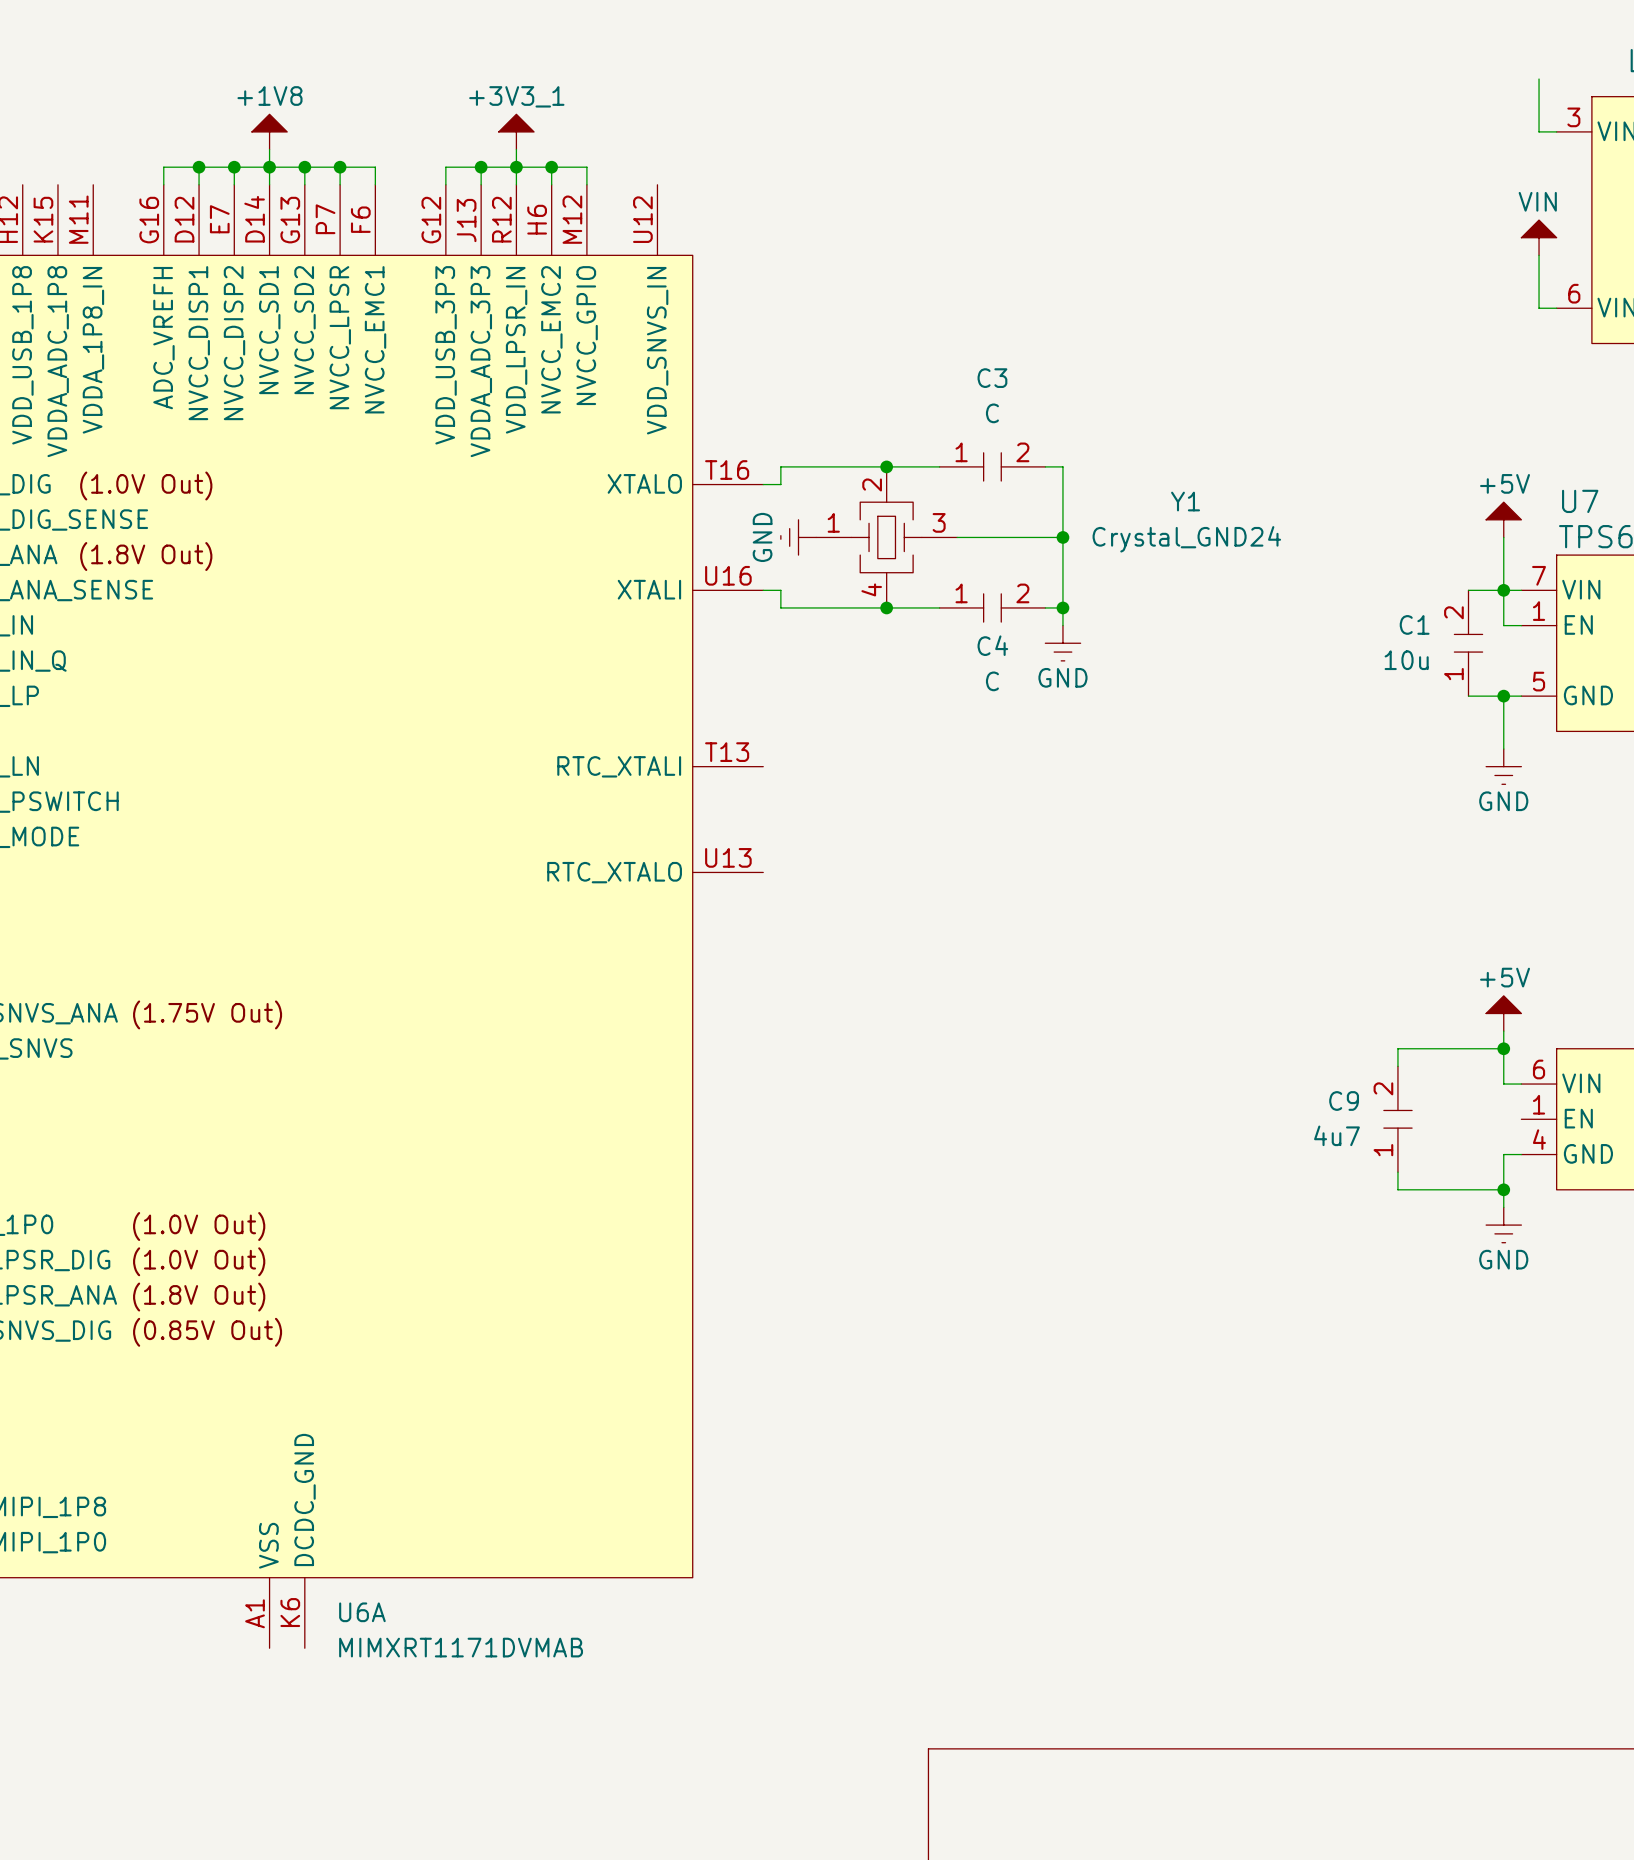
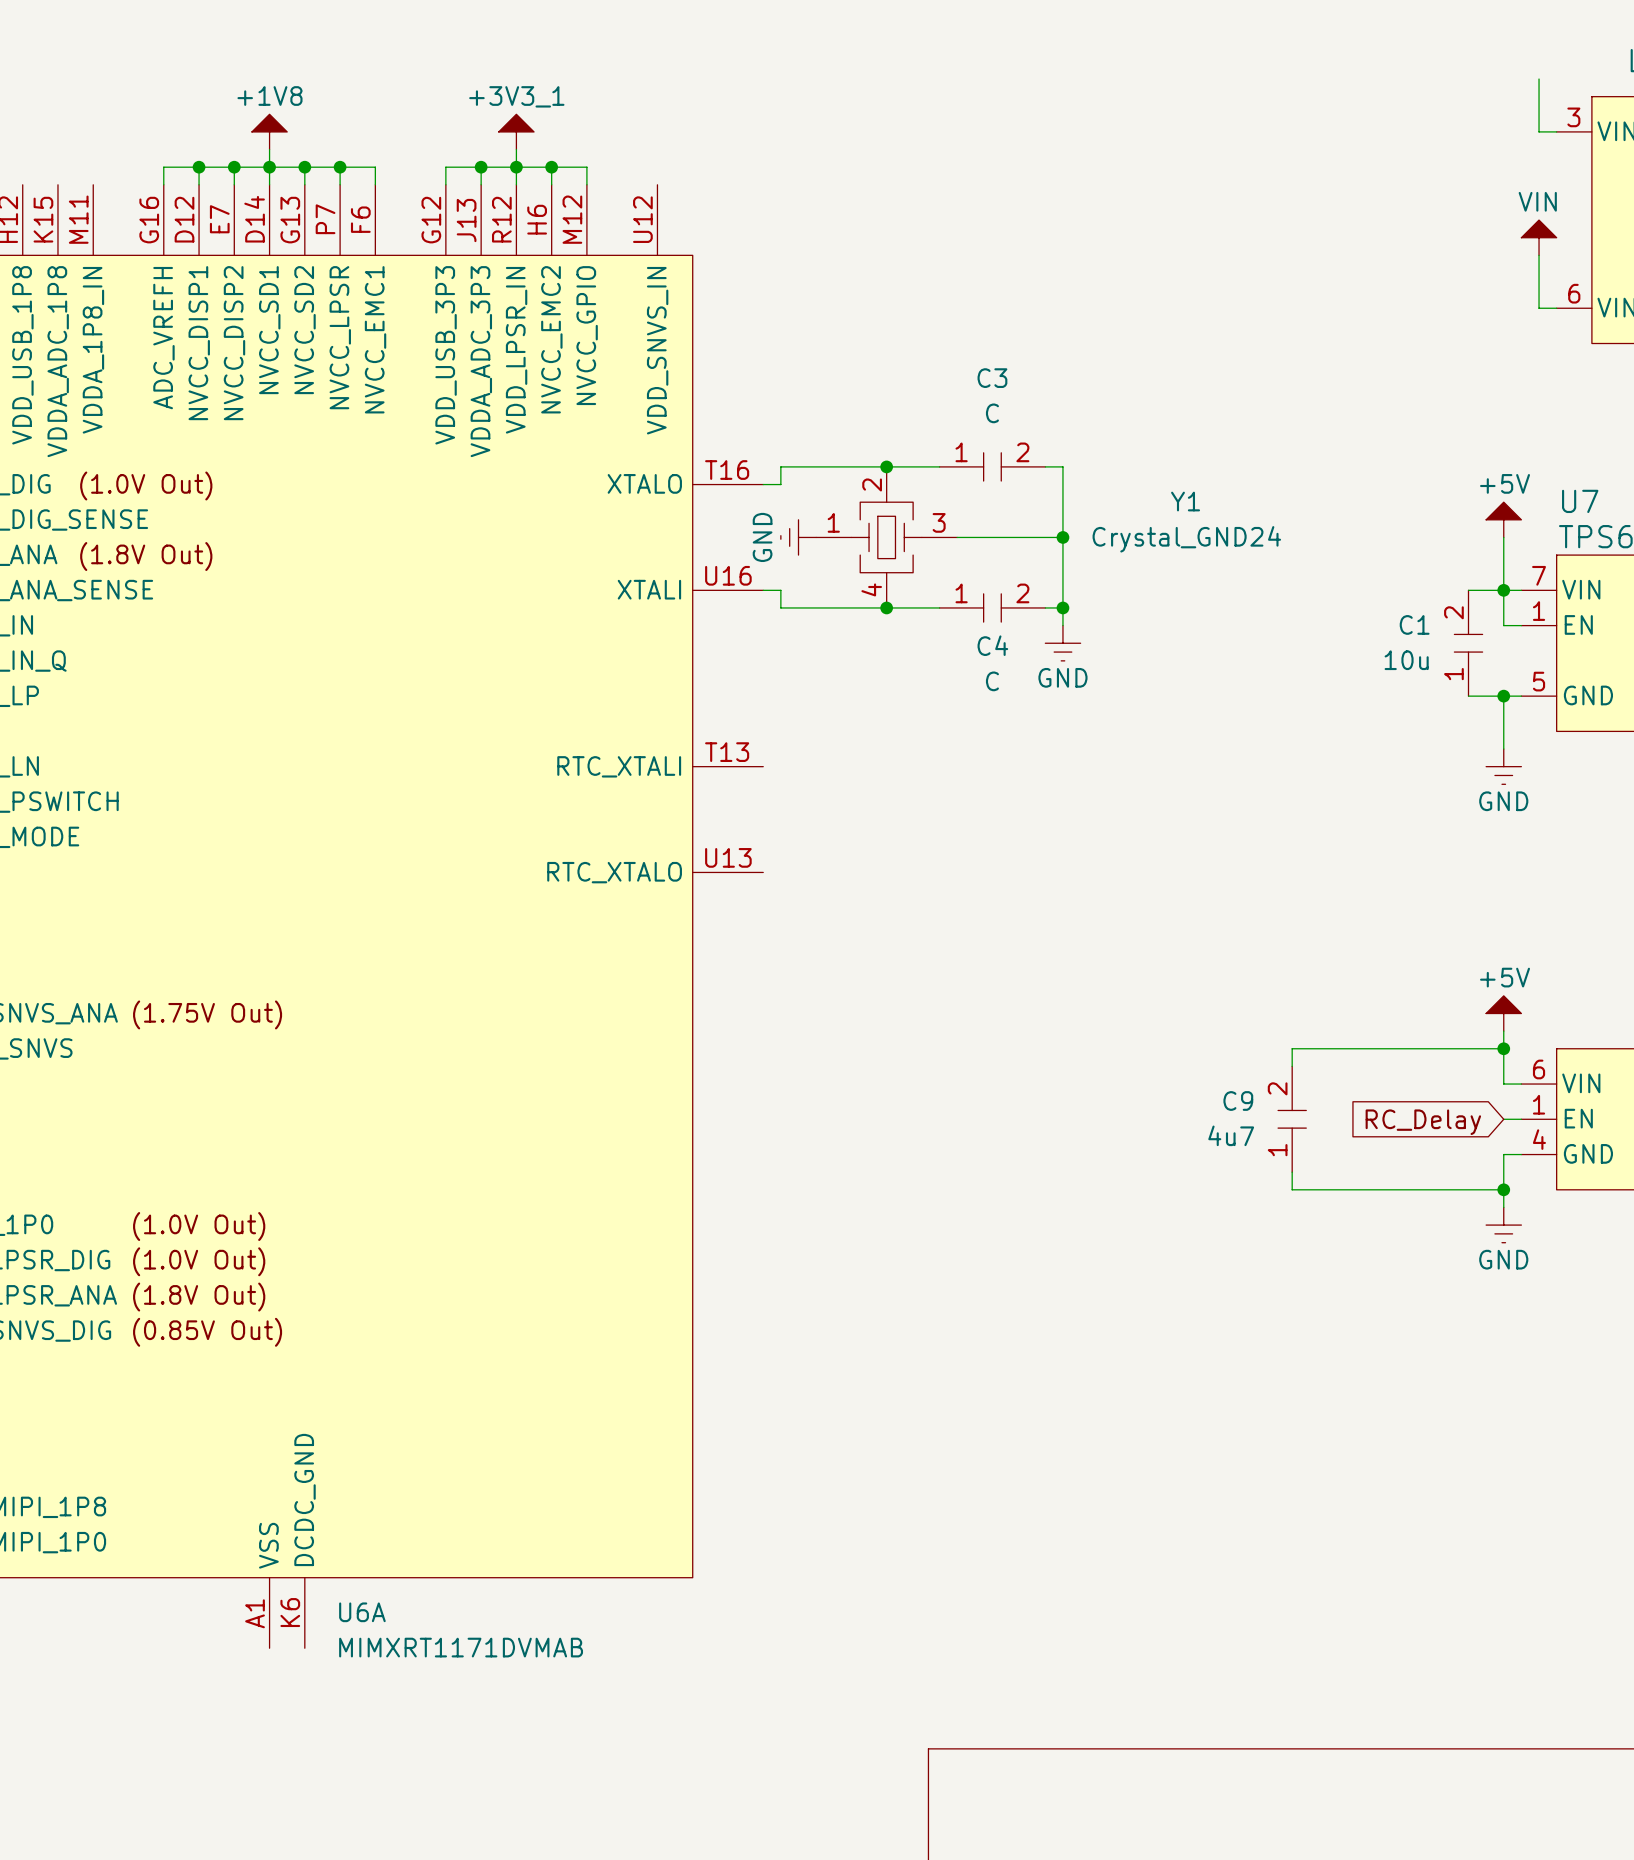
wire: (1397, 1048) (1397, 1066) -> (1397, 1048) (1292, 1048) (1292, 1066)
C9 position: (1397, 1119) -> (1292, 1119)
wire: none -> (1503, 1119) (1521, 1119)
global label: none -> RC_Delay (1423, 1122)
wire: (1397, 1172) (1397, 1189) -> (1292, 1172) (1292, 1189) (1397, 1189)

